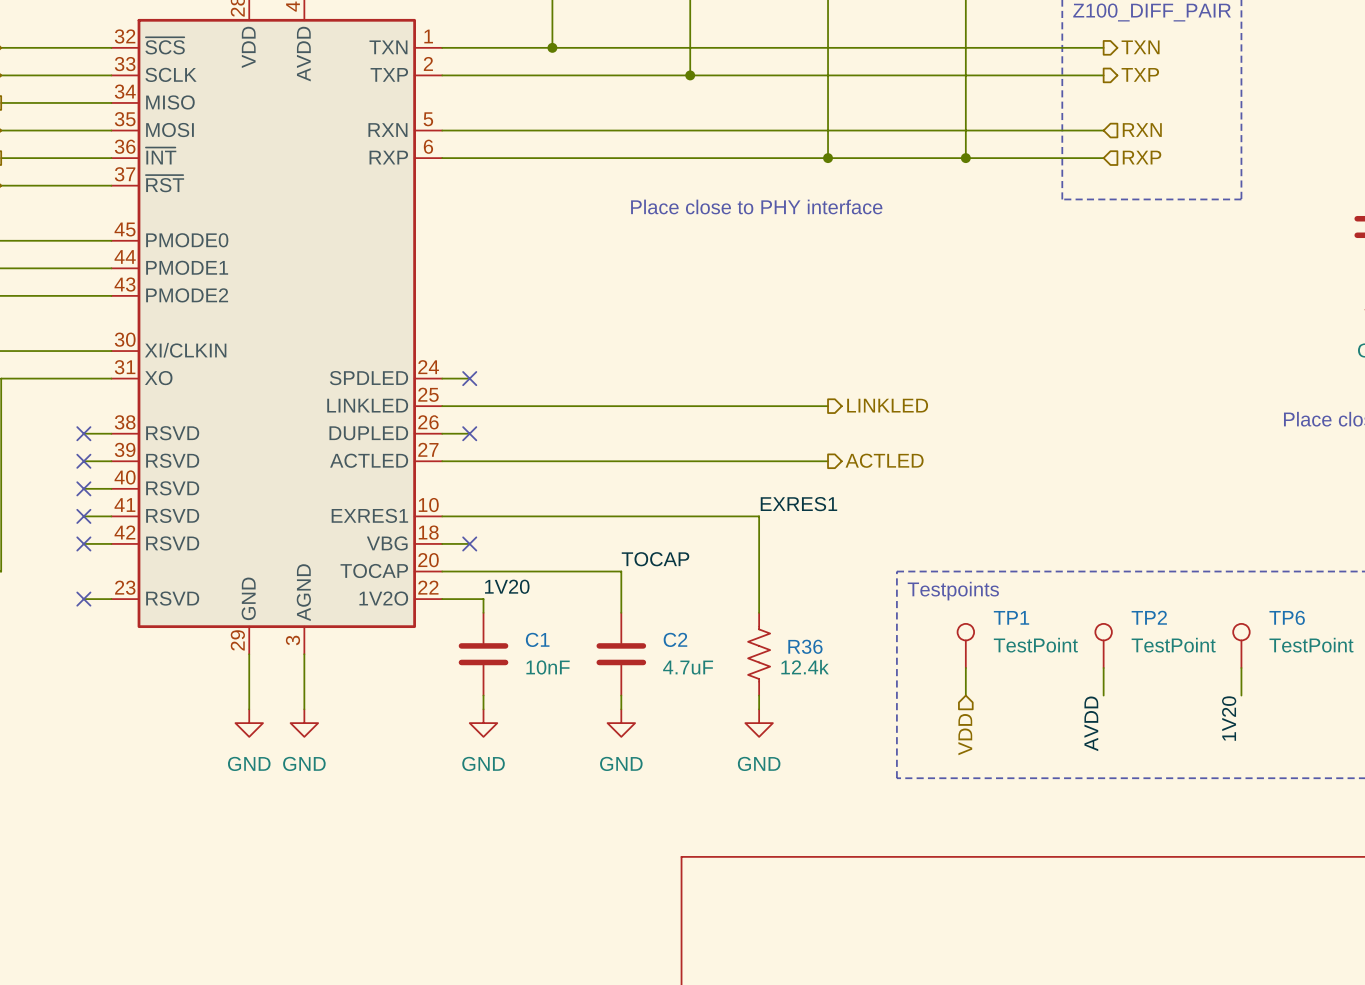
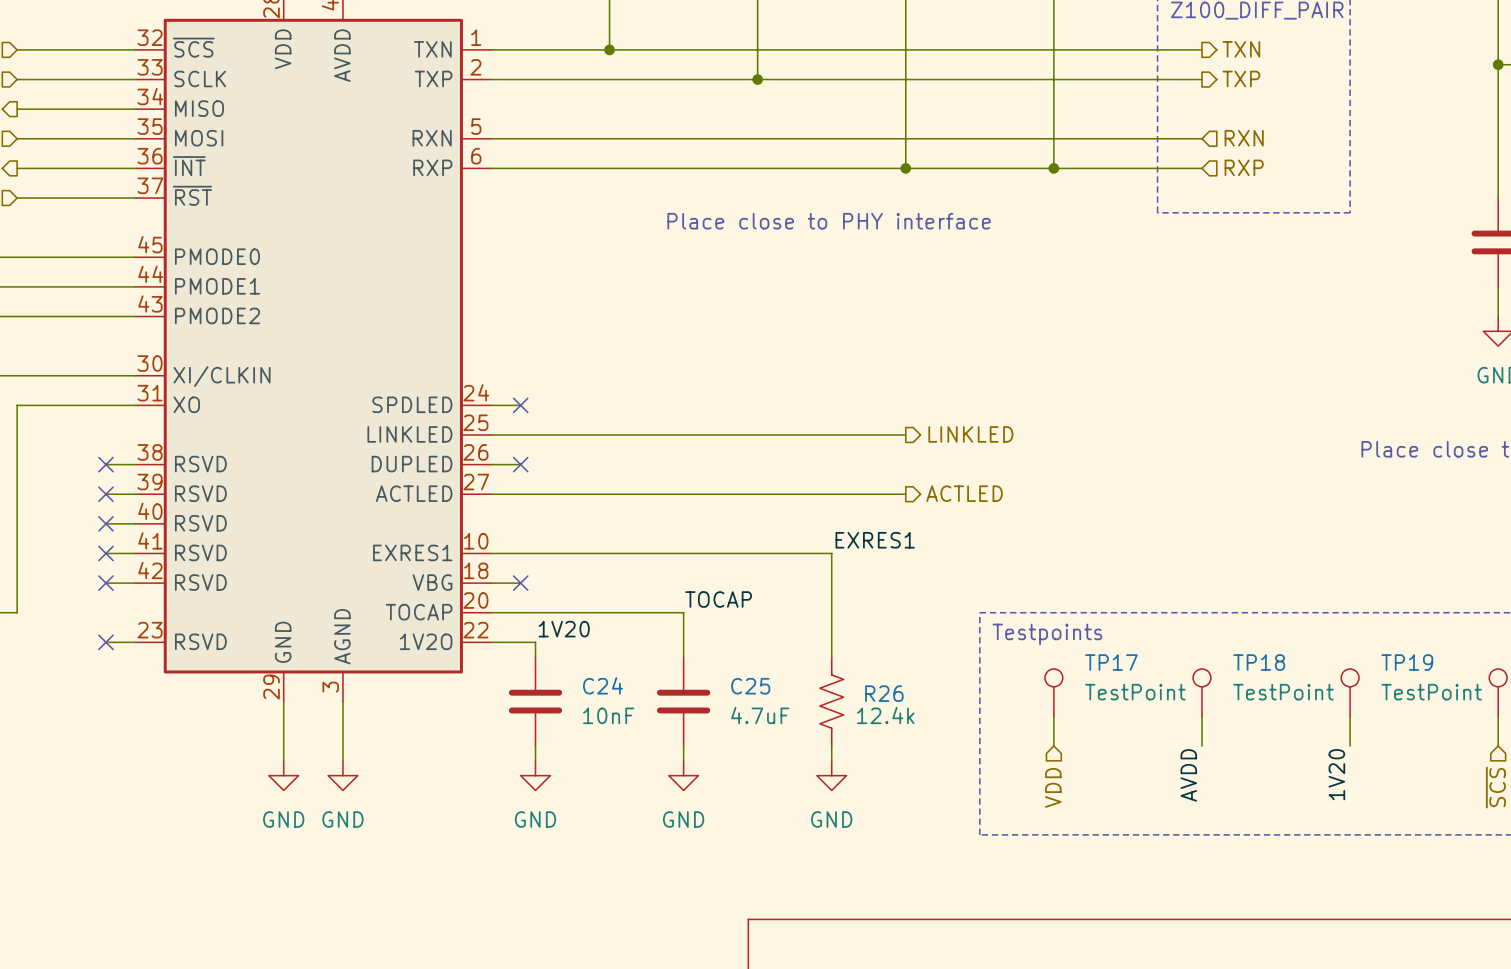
TP1 name: TP1 (1011, 617) -> TP17 (1111, 662)
TP2 name: TP2 (1149, 617) -> TP18 (1259, 662)
TP6 name: TP6 (1287, 617) -> TP19 (1407, 662)
C1 name: C1 (537, 639) -> C24 (602, 685)
C2 name: C2 (675, 639) -> C25 (750, 686)
R36 name: R36 (805, 646) -> R26 (884, 693)

